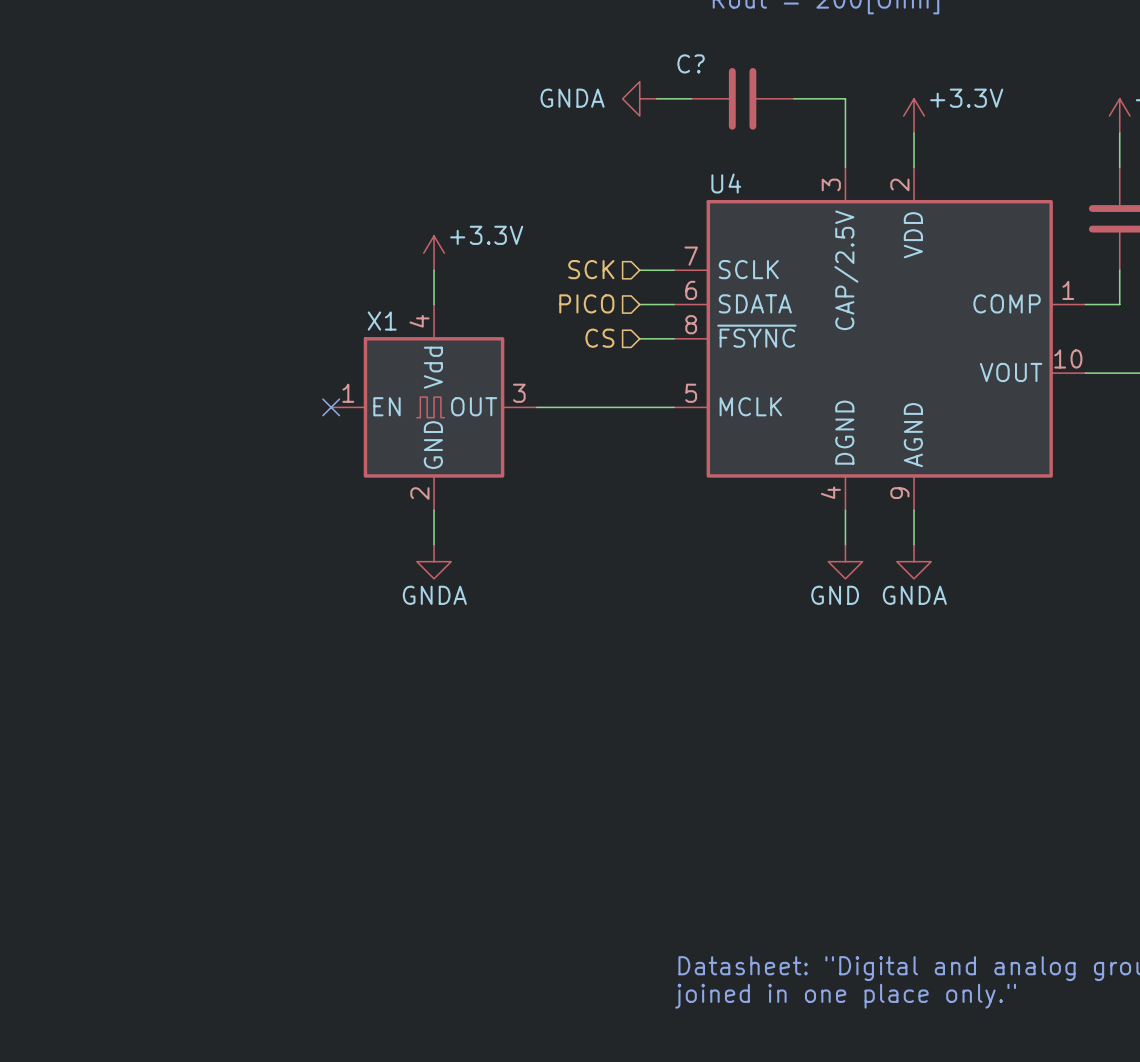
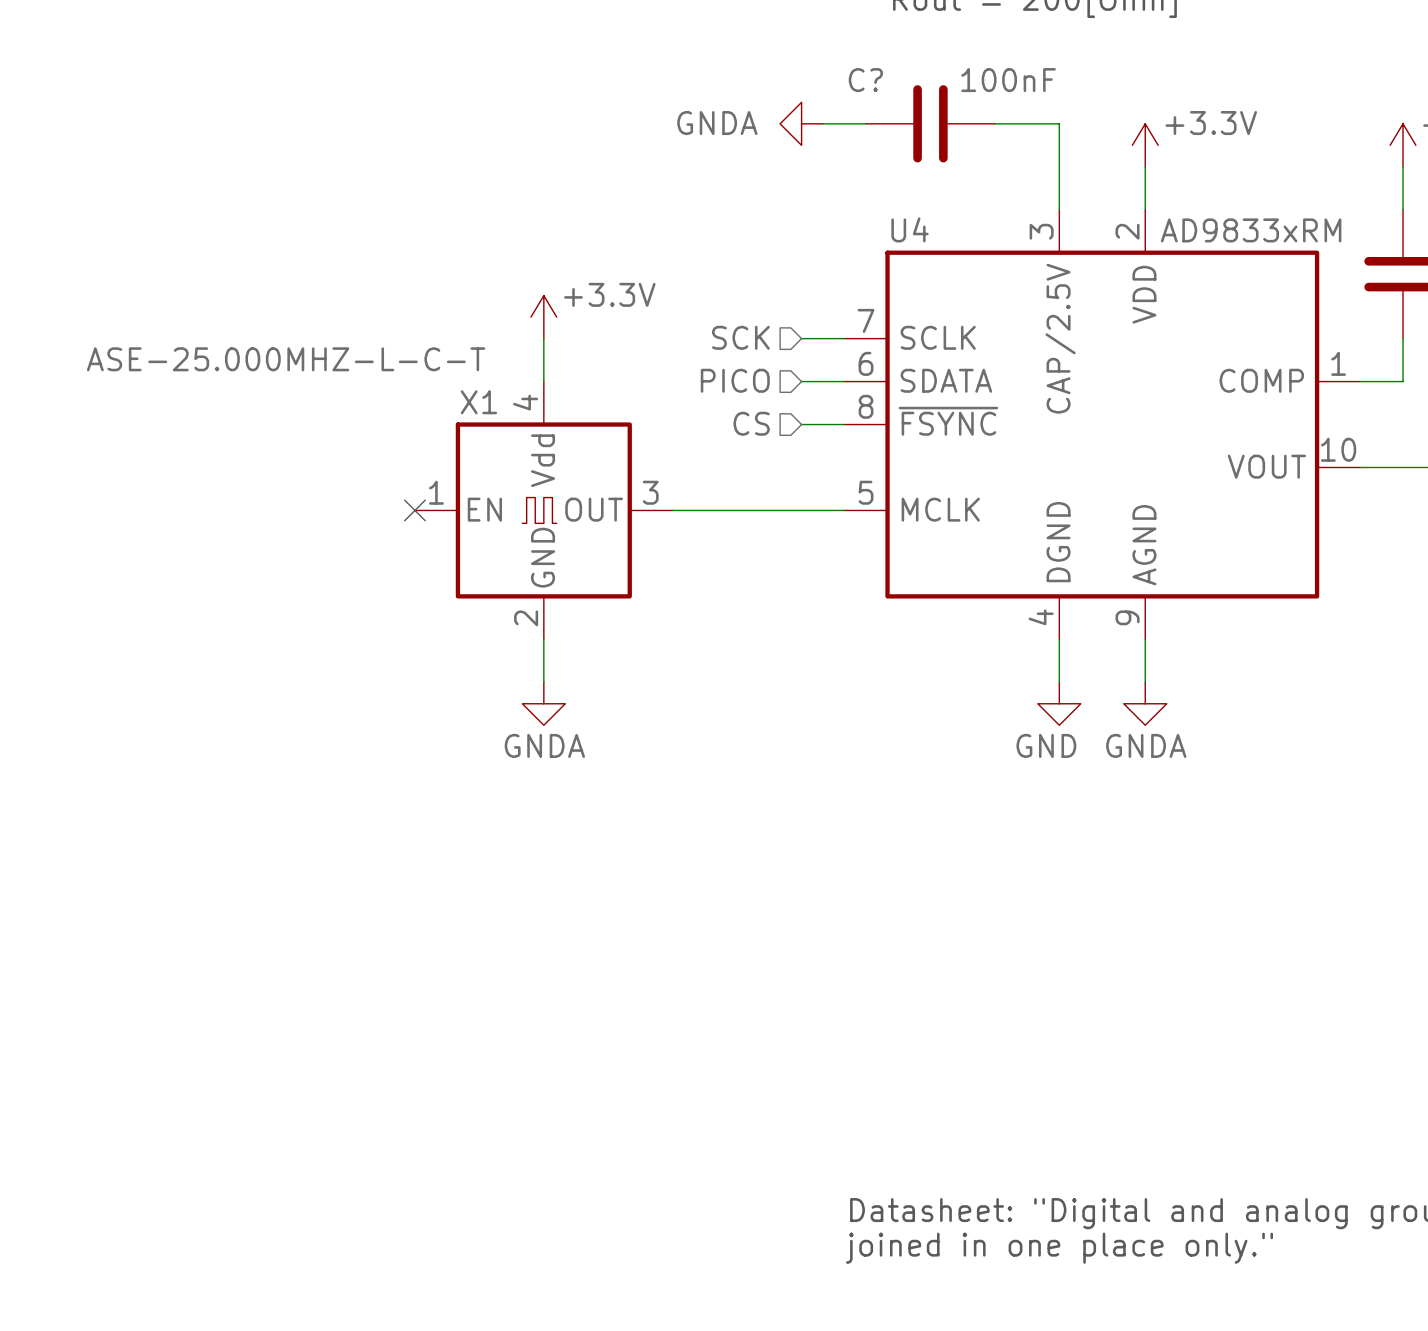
C? value: none -> 100nF (1008, 80)
U4 value: none -> AD9833xRM (1251, 230)
X1 value: none -> ASE-25.000MHZ-L-C-T (286, 359)

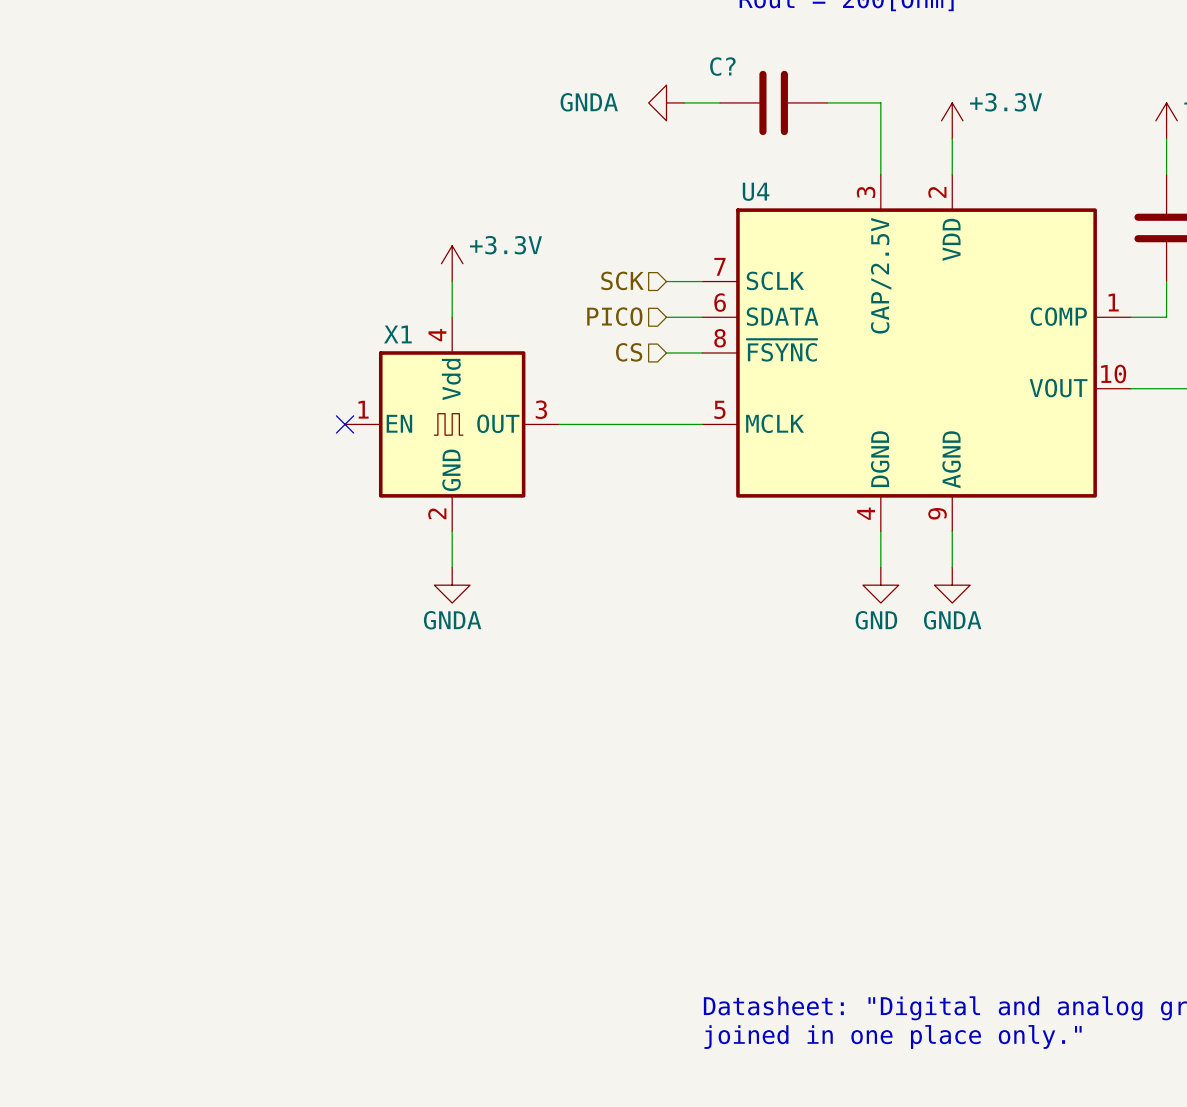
C? value: 100nF (1008, 80) -> none
U4 value: AD9833xRM (1251, 230) -> none
X1 value: ASE-25.000MHZ-L-C-T (286, 359) -> none

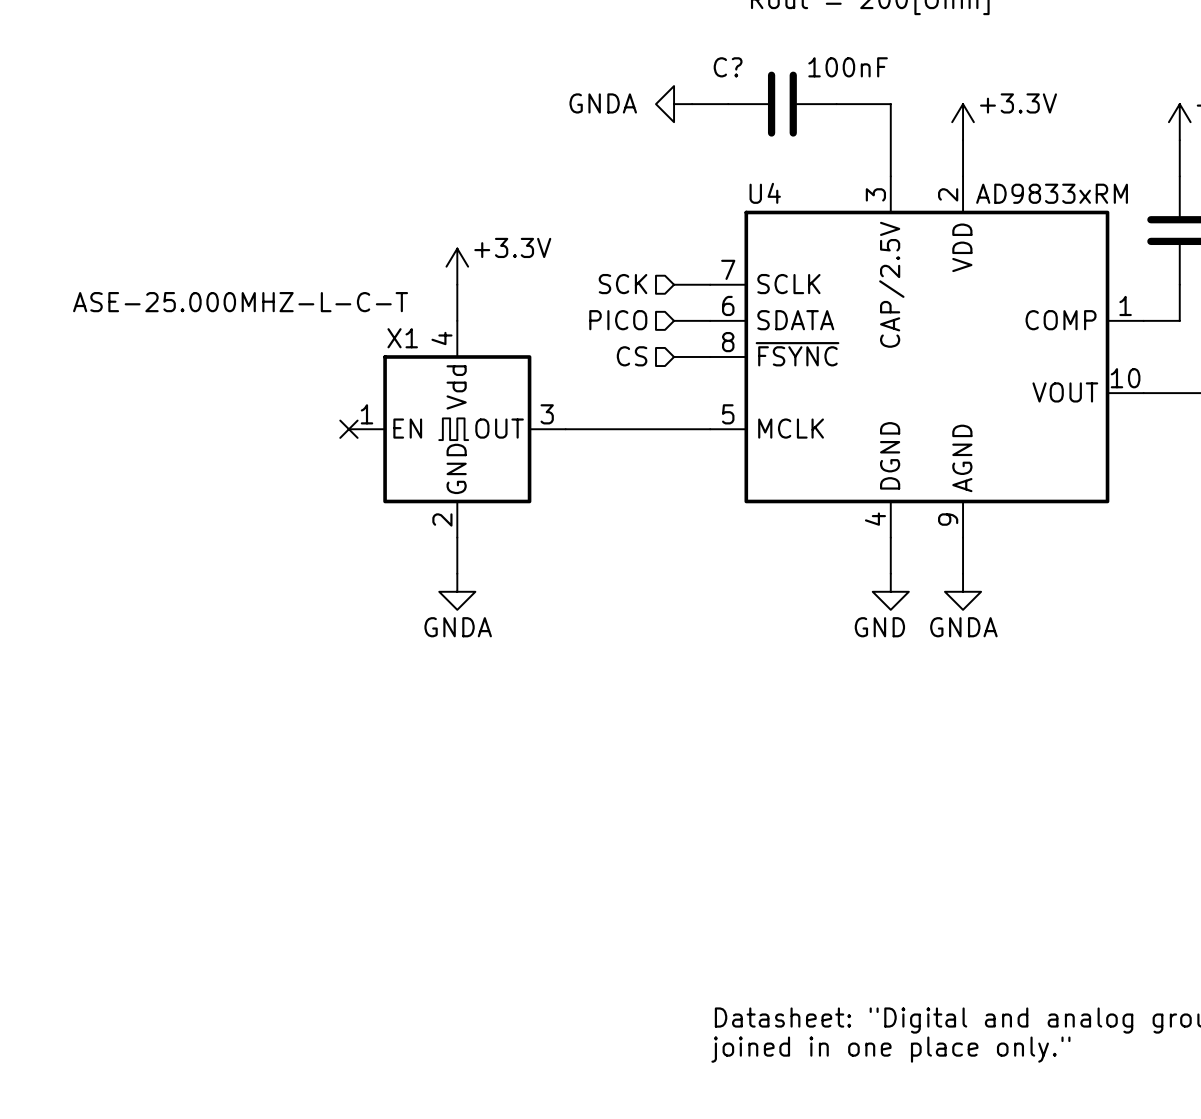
C? value: none -> 100nF (848, 67)
U4 value: none -> AD9833xRM (1052, 193)
X1 value: none -> ASE-25.000MHZ-L-C-T (240, 302)

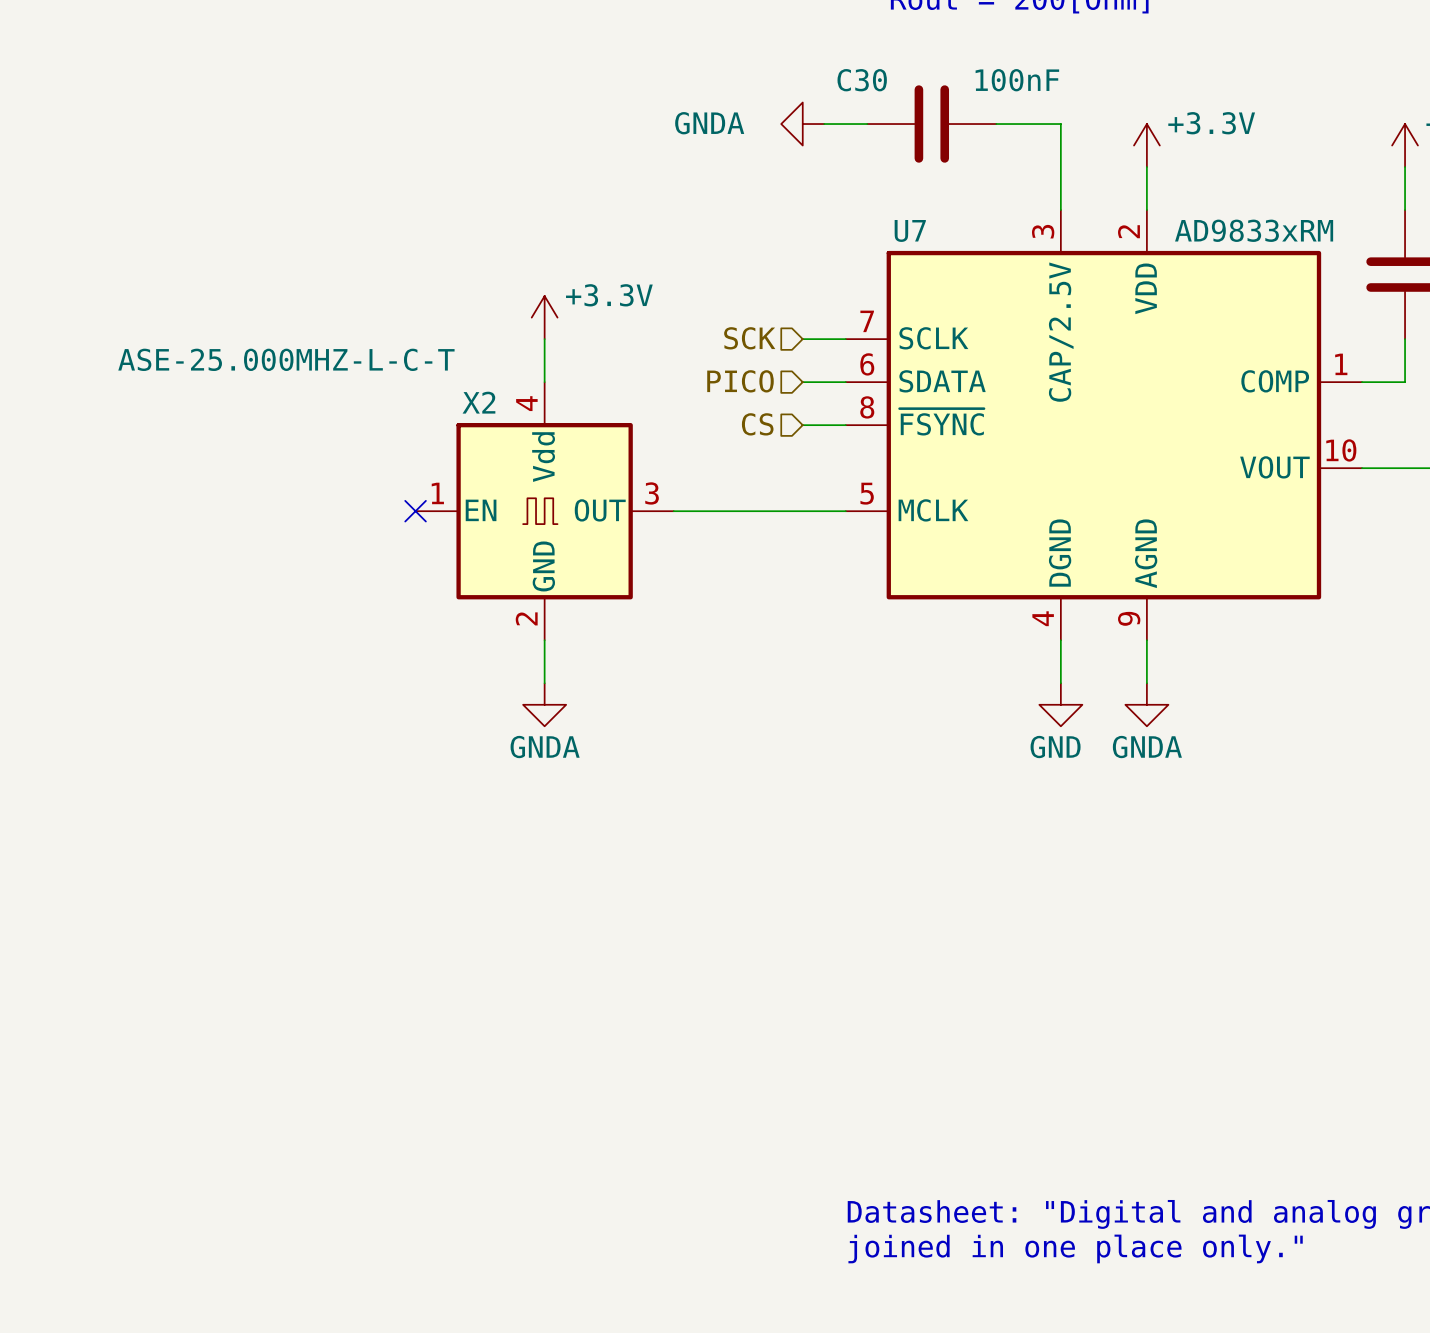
C? name: C? (728, 67) -> C30 (862, 80)
U4 name: U4 (765, 193) -> U7 (910, 230)
X1 name: X1 (402, 338) -> X2 (478, 402)

